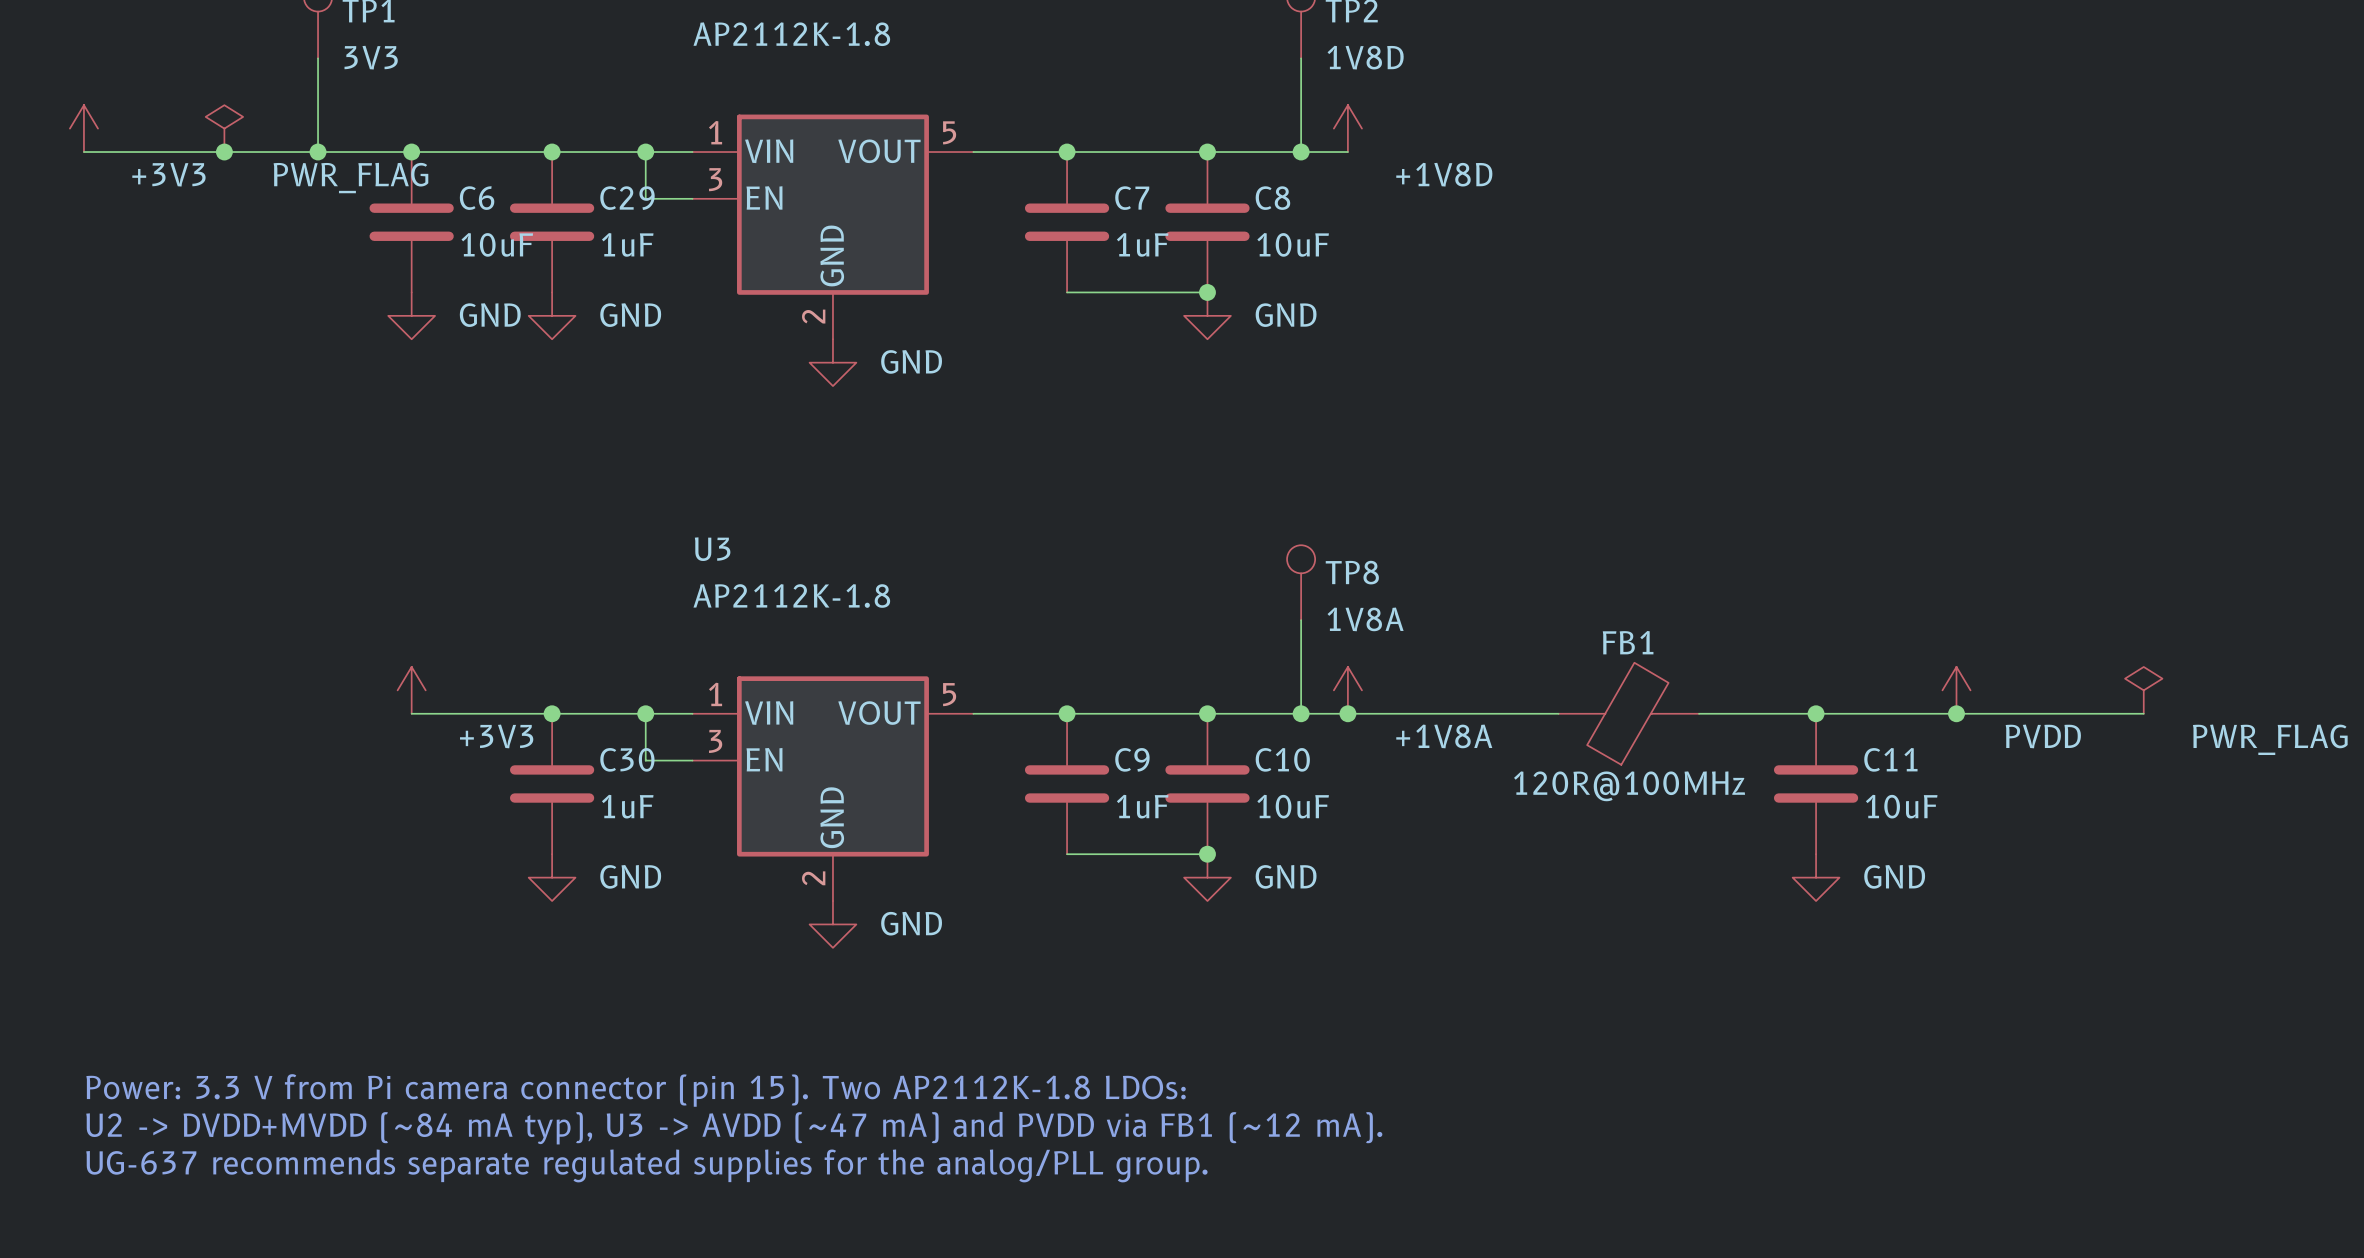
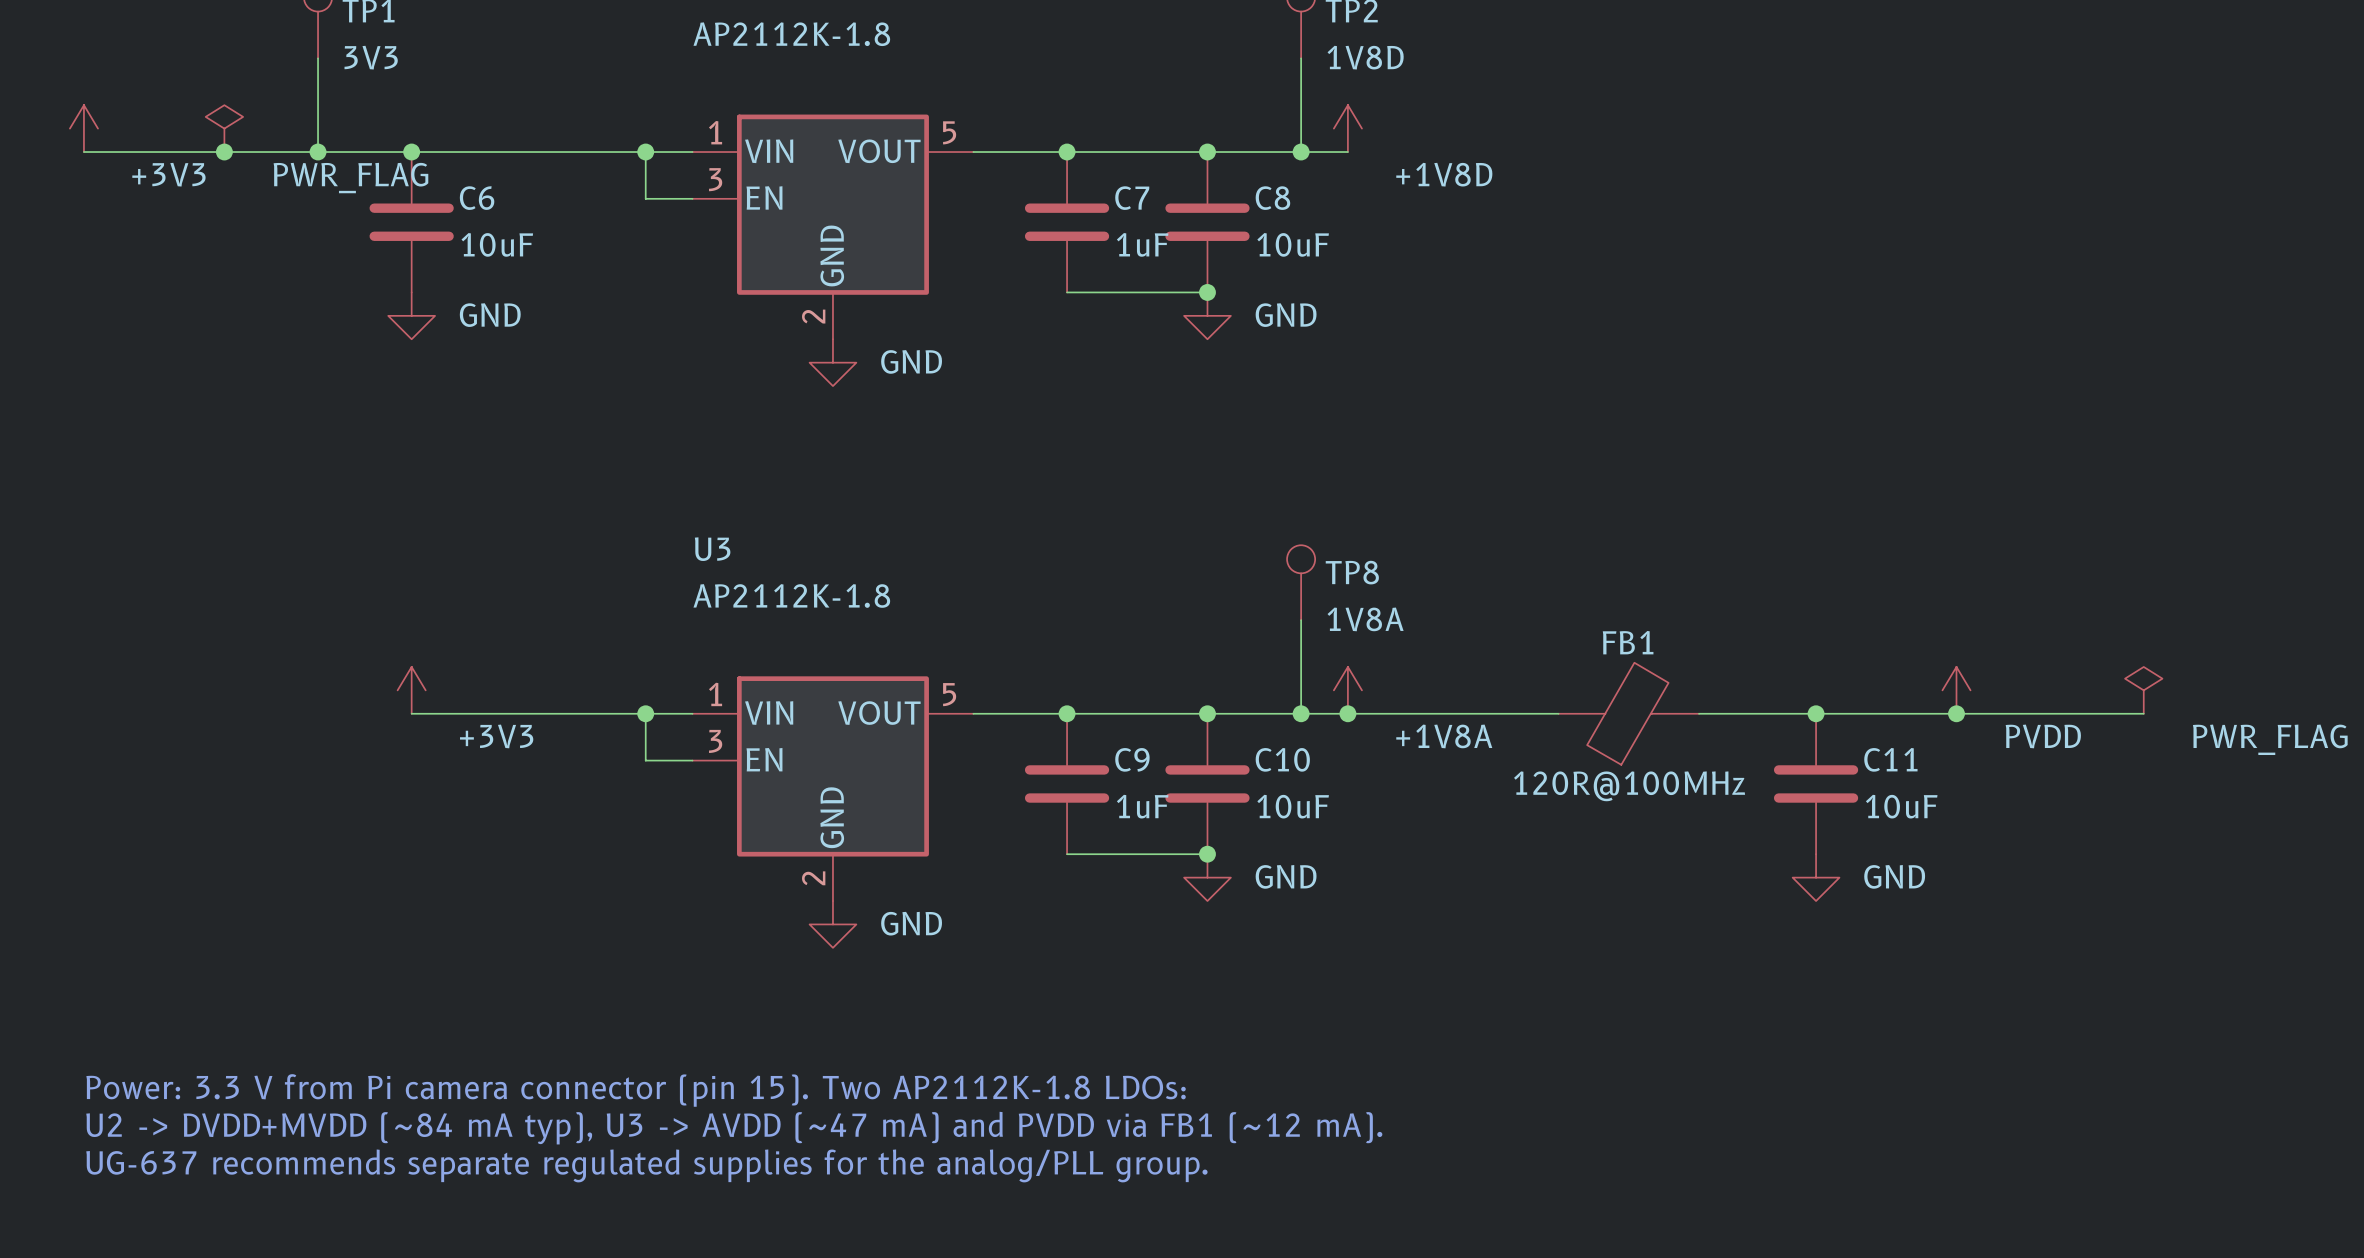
junction: (552, 152) -> none
C29: 1uF (552, 222) -> none
power symbol: GND (552, 315) -> none
junction: (552, 713) -> none
C30: 1uF (552, 783) -> none
power symbol: GND (552, 877) -> none

